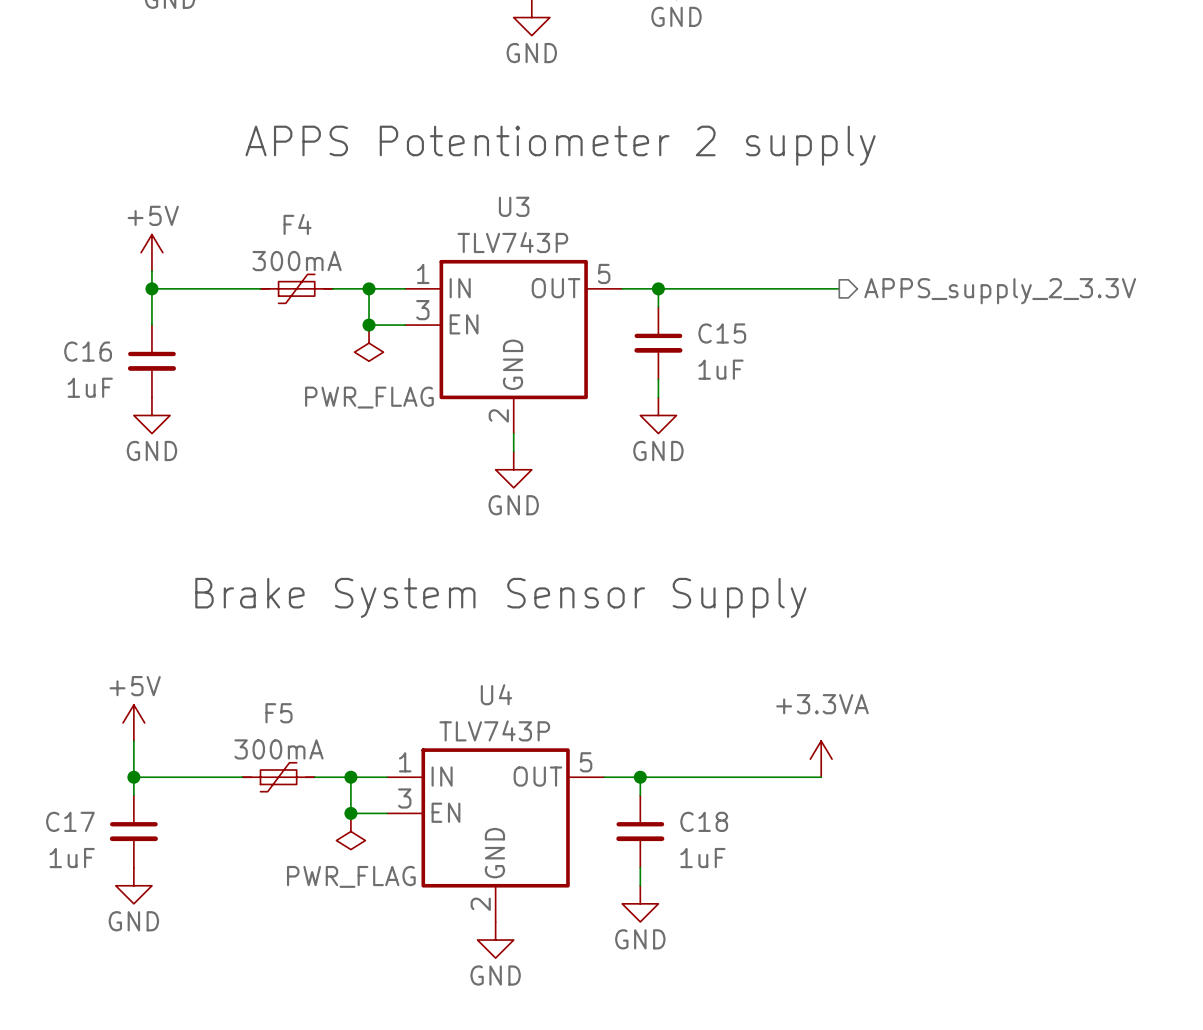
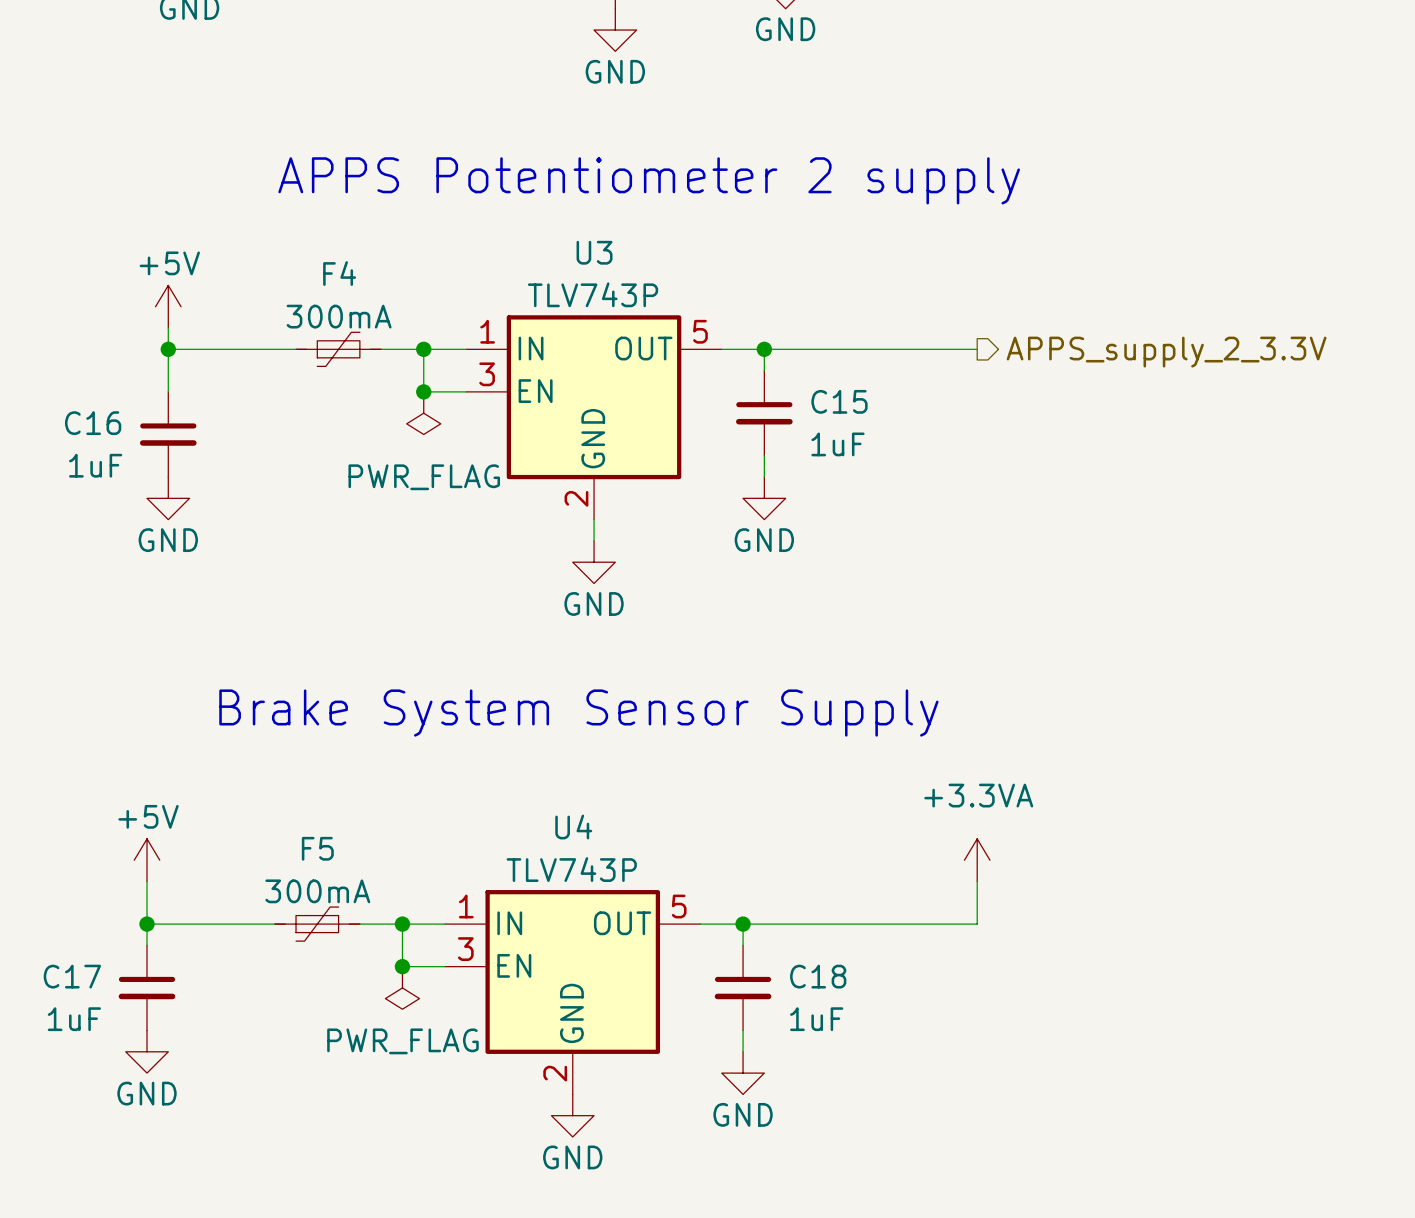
wire: none -> (977, 881) (977, 924) (955, 924)
power symbol position: +3.3VA (821, 759) -> +3.3VA (977, 860)

